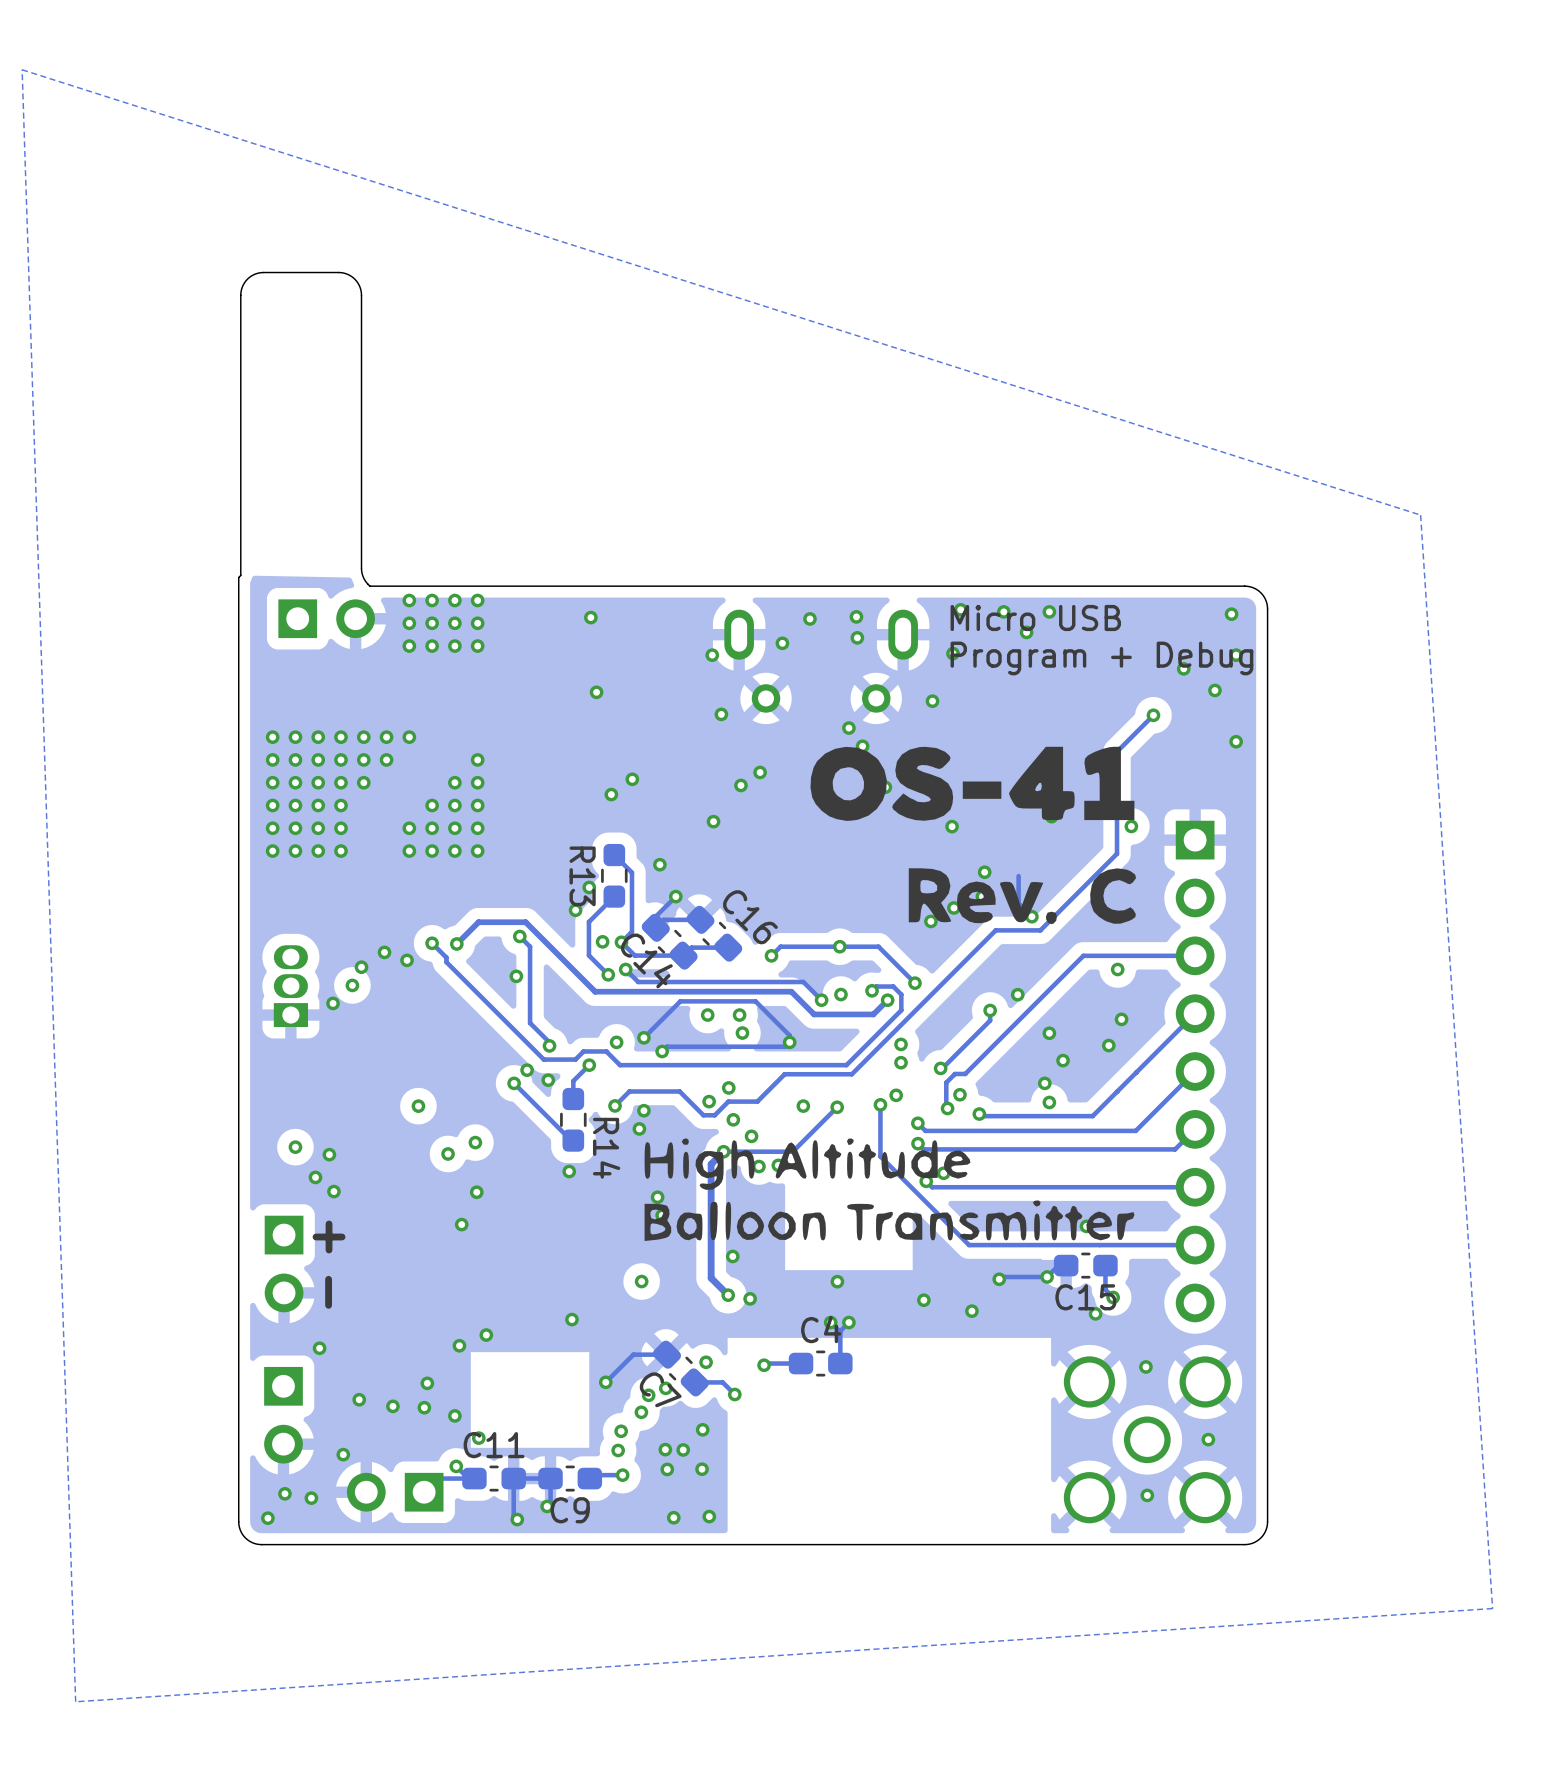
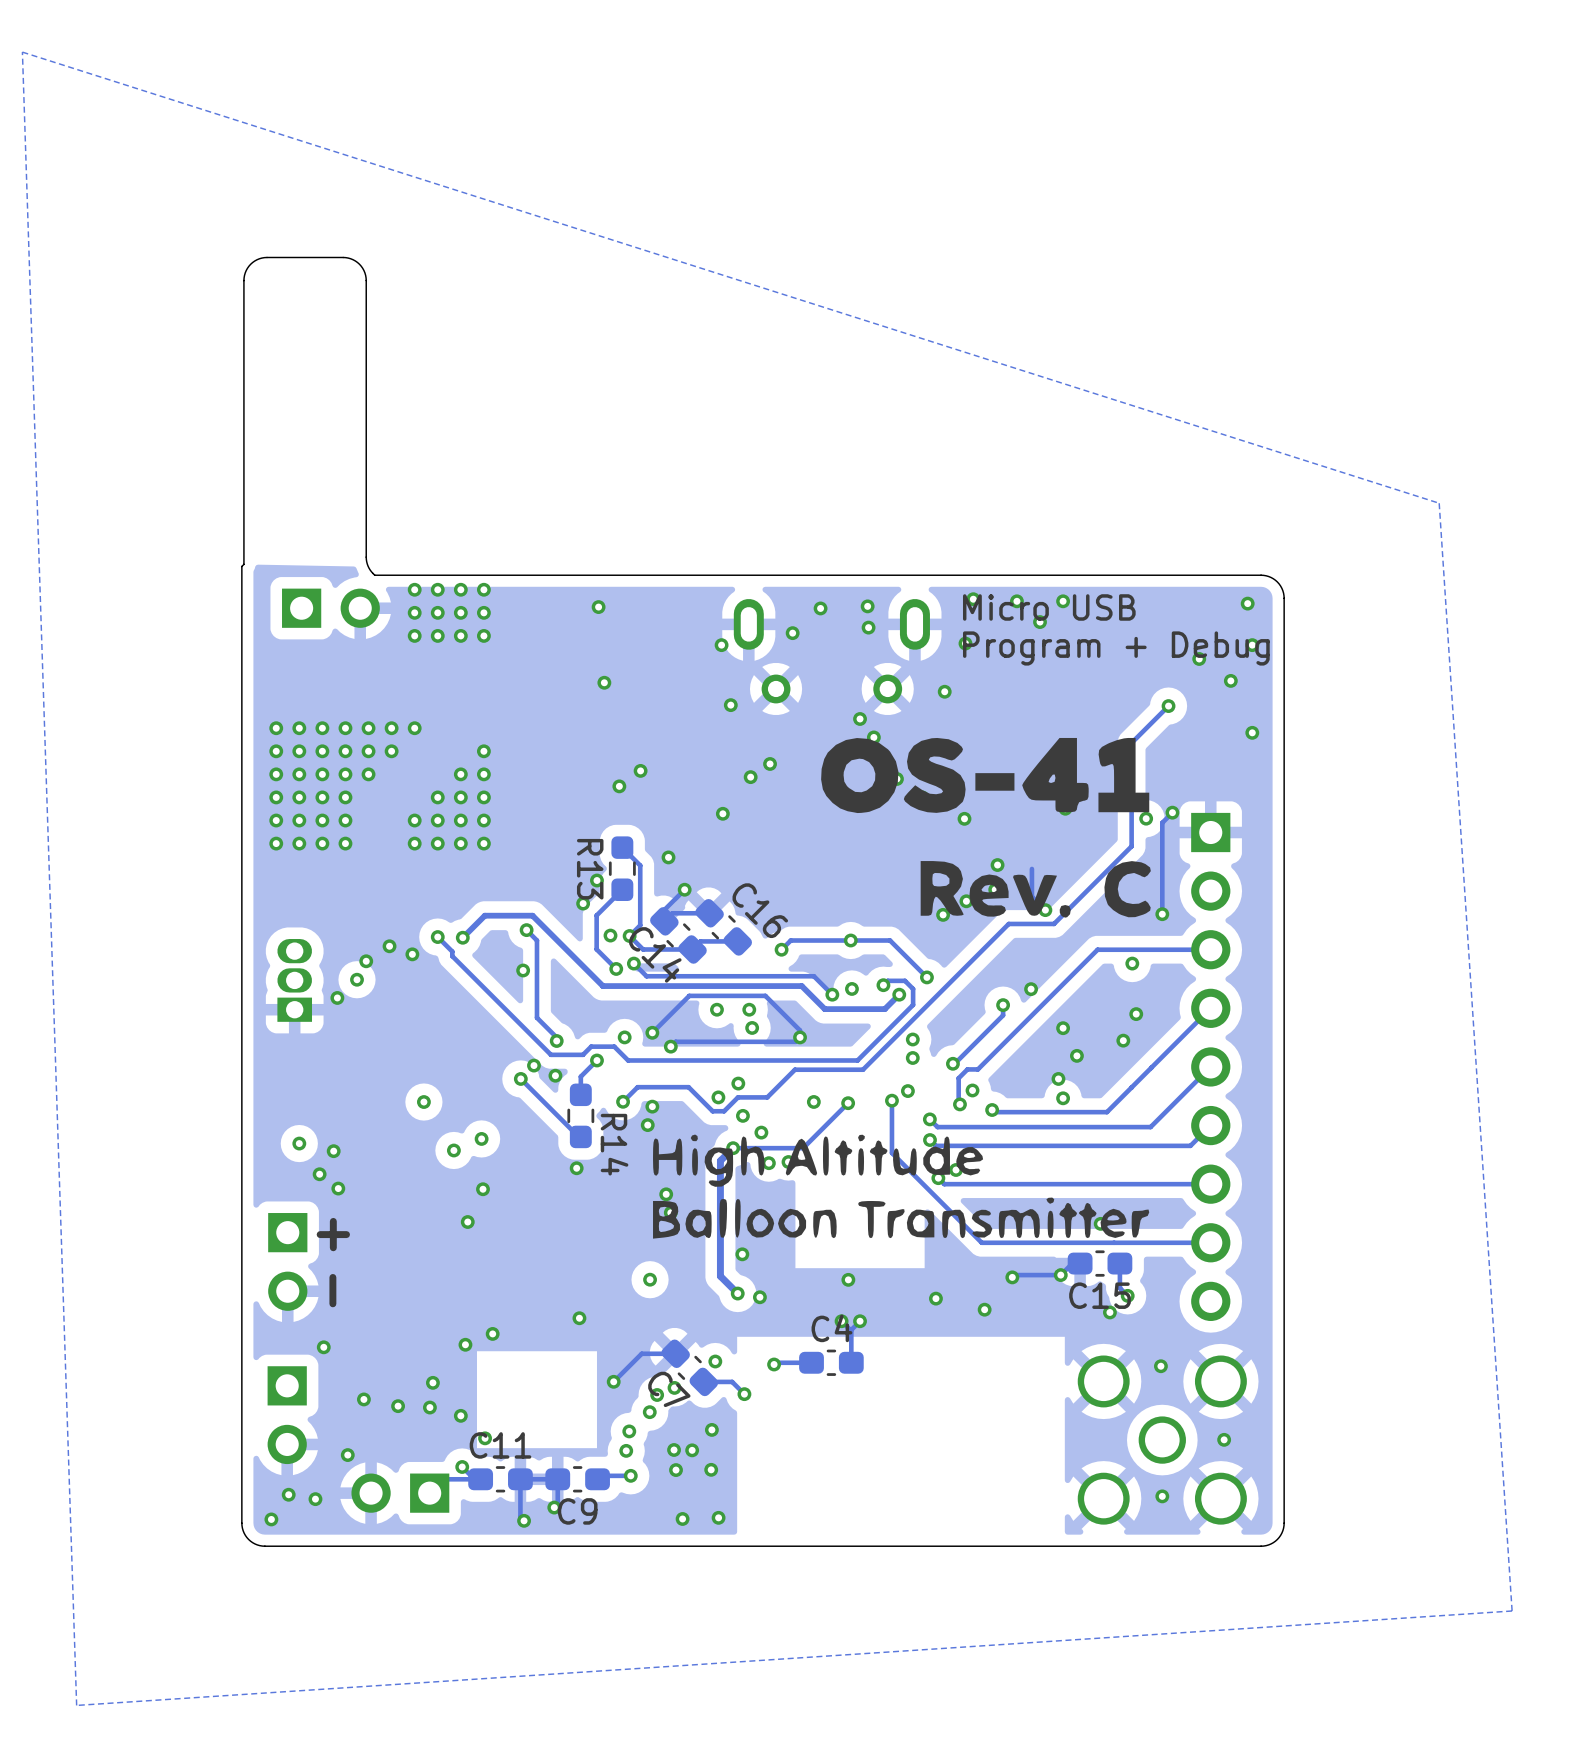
track: none -> (1172, 812) (1162, 822) (1162, 914)
via: none -> (1172, 812)
via: none -> (1162, 914)

